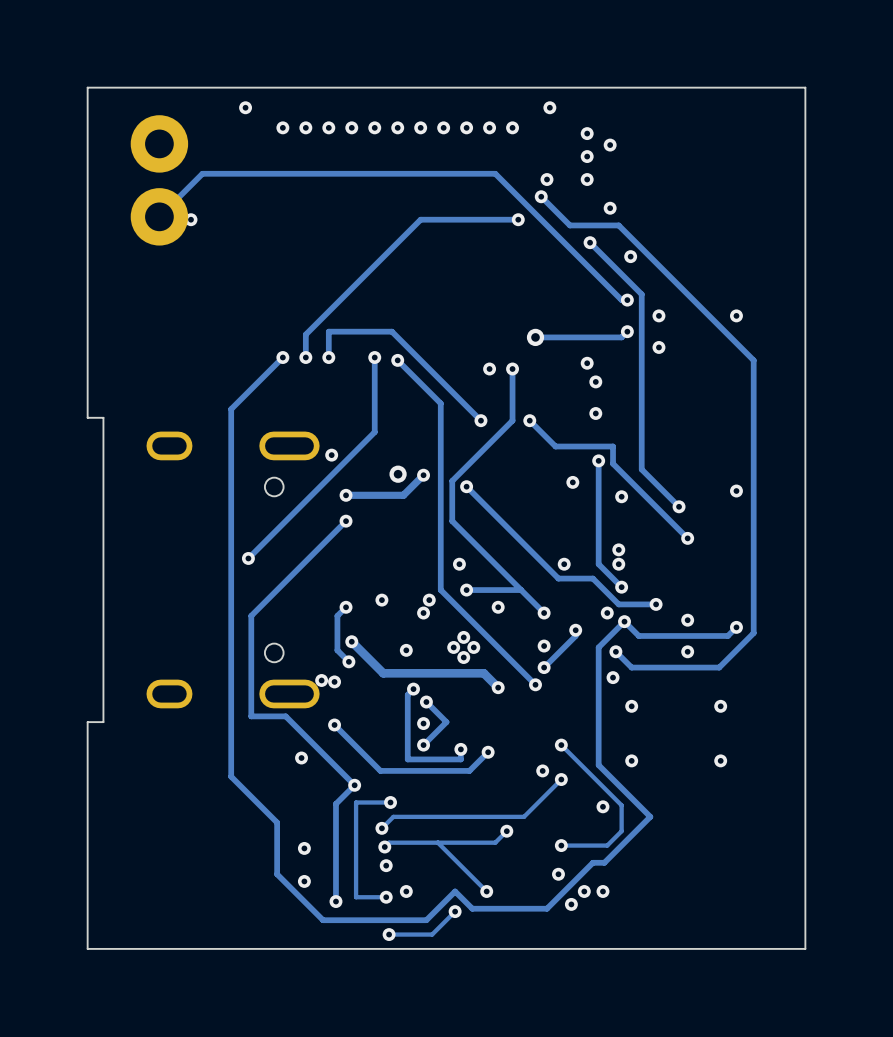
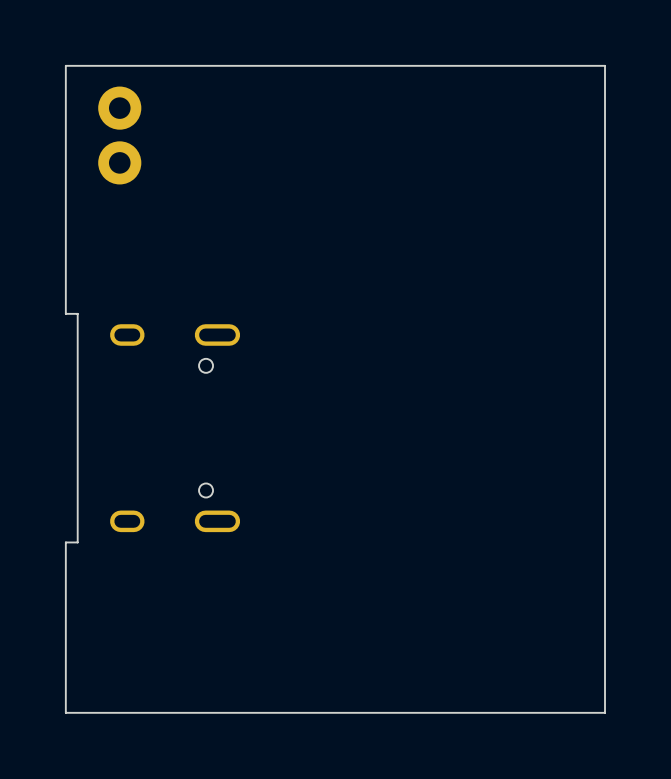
via: (245, 107) -> none
via: (549, 107) -> none
via: (282, 127) -> none
via: (305, 127) -> none
via: (328, 127) -> none
via: (351, 127) -> none
via: (374, 127) -> none
via: (397, 127) -> none
via: (420, 127) -> none
via: (443, 127) -> none
via: (466, 127) -> none
via: (489, 127) -> none
via: (512, 127) -> none
via: (587, 133) -> none
via: (610, 145) -> none
via: (587, 156) -> none
via: (546, 179) -> none
via: (587, 179) -> none
track: (541, 196) (569, 225) (618, 225) (753, 360) (753, 633) (719, 667) (631, 667) (615, 651) -> none
via: (541, 196) -> none
via: (610, 208) -> none
track: (159, 216) (202, 173) (495, 173) (621, 300) (627, 300) -> none
via: (191, 219) -> none
track: (518, 219) (420, 219) (305, 334) (305, 357) -> none
via: (518, 219) -> none
track: (590, 242) (641, 294) (641, 469) (679, 506) -> none
via: (590, 242) -> none
via: (630, 256) -> none
via: (627, 300) -> none
via: (658, 315) -> none
via: (736, 315) -> none
track: (627, 331) (621, 337) (535, 337) -> none
via: (627, 331) -> none
via: (535, 337) -> none
via: (658, 347) -> none
track: (282, 357) (231, 409) (231, 776) (277, 822) (277, 874) (323, 920) (426, 920) (455, 891) (472, 908) (546, 908) (592, 862) (604, 862) (650, 816) (598, 765) (598, 647) (624, 621) (638, 635) (727, 635) (736, 627) -> none
via: (282, 357) -> none
via: (305, 357) -> none
track: (328, 357) (328, 331) (391, 331) (480, 420) -> none
via: (328, 357) -> none
track: (374, 357) (374, 432) (248, 558) -> none
via: (374, 357) -> none
track: (397, 360) (440, 403) (440, 590) (535, 684) -> none
via: (397, 360) -> none
via: (587, 363) -> none
via: (489, 369) -> none
track: (512, 369) (512, 420) (452, 480) (452, 521) (544, 613) -> none
via: (512, 369) -> none
via: (595, 381) -> none
via: (595, 413) -> none
via: (480, 420) -> none
track: (529, 420) (555, 446) (613, 446) (613, 463) (687, 538) -> none
via: (529, 420) -> none
via: (331, 455) -> none
track: (598, 460) (598, 564) (621, 587) -> none
via: (598, 460) -> none
via: (398, 474) -> none
track: (423, 475) (403, 495) (346, 495) -> none
via: (423, 475) -> none
via: (572, 482) -> none
track: (466, 486) (558, 578) (592, 578) (618, 604) (656, 604) -> none
via: (466, 486) -> none
via: (736, 491) -> none
via: (346, 495) -> none
via: (621, 496) -> none
via: (679, 506) -> none
track: (346, 521) (251, 615) (251, 716) (285, 716) (354, 785) (335, 803) (335, 901) -> none
via: (346, 521) -> none
via: (687, 538) -> none
via: (618, 549) -> none
via: (248, 558) -> none
via: (459, 564) -> none
via: (564, 564) -> none
via: (618, 564) -> none
via: (621, 587) -> none
via: (466, 590) -> none
track: (521, 590) (466, 590) -> none
via: (381, 600) -> none
via: (429, 600) -> none
via: (656, 604) -> none
track: (346, 607) (337, 615) (337, 650) (348, 661) -> none
via: (346, 607) -> none
via: (498, 607) -> none
via: (423, 613) -> none
via: (544, 613) -> none
via: (607, 613) -> none
via: (687, 620) -> none
via: (624, 621) -> none
via: (736, 627) -> none
track: (575, 630) (575, 635) (544, 667) -> none
via: (575, 630) -> none
via: (463, 637) -> none
track: (351, 641) (383, 673) (483, 673) (498, 687) -> none
via: (351, 641) -> none
via: (544, 646) -> none
via: (453, 647) -> none
via: (473, 647) -> none
via: (406, 650) -> none
via: (615, 651) -> none
via: (687, 651) -> none
via: (463, 657) -> none
via: (348, 661) -> none
via: (544, 667) -> none
via: (613, 677) -> none
via: (321, 680) -> none
via: (334, 681) -> none
via: (535, 684) -> none
via: (498, 687) -> none
track: (413, 689) (407, 694) (407, 759) (460, 759) (460, 749) -> none
via: (413, 689) -> none
track: (426, 702) (446, 722) (423, 745) -> none
via: (426, 702) -> none
via: (631, 706) -> none
via: (720, 706) -> none
via: (423, 723) -> none
track: (334, 724) (380, 770) (469, 770) (488, 752) -> none
via: (334, 724) -> none
via: (423, 745) -> none
track: (561, 745) (621, 805) (621, 831) (607, 845) (561, 845) -> none
via: (561, 745) -> none
via: (460, 749) -> none
via: (488, 752) -> none
via: (301, 758) -> none
via: (631, 760) -> none
via: (720, 760) -> none
via: (542, 770) -> none
track: (561, 779) (524, 816) (393, 816) (381, 828) -> none
via: (561, 779) -> none
via: (354, 785) -> none
track: (390, 802) (356, 802) (356, 897) (386, 897) -> none
via: (390, 802) -> none
via: (602, 806) -> none
via: (381, 828) -> none
track: (506, 831) (495, 842) (389, 842) (384, 847) -> none
via: (506, 831) -> none
track: (437, 842) (486, 891) -> none
via: (561, 845) -> none
via: (384, 847) -> none
via: (304, 848) -> none
via: (386, 865) -> none
via: (558, 874) -> none
via: (304, 881) -> none
via: (406, 891) -> none
via: (486, 891) -> none
via: (584, 891) -> none
via: (602, 891) -> none
via: (386, 897) -> none
via: (335, 901) -> none
via: (571, 904) -> none
track: (455, 911) (432, 934) (389, 934) -> none
via: (455, 911) -> none
via: (389, 934) -> none

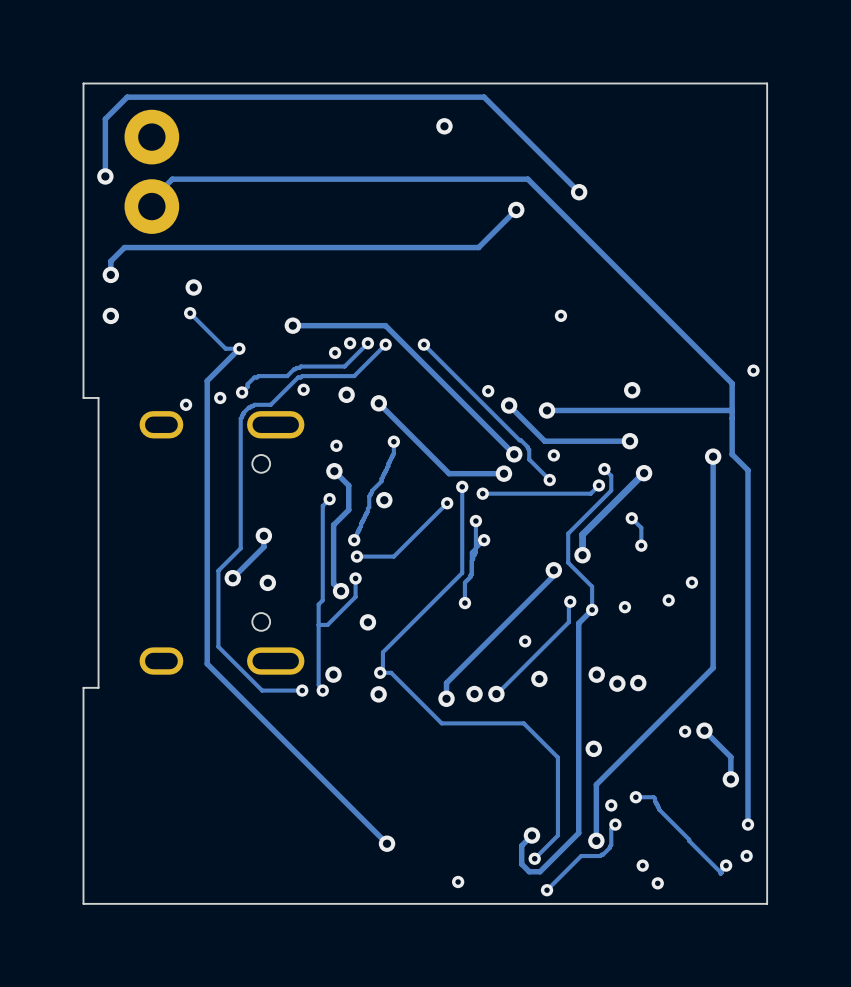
via: none -> (444, 126)
track: none -> (105, 176) (105, 119) (127, 97) (484, 97) (579, 192)
via: none -> (105, 176)
via: none -> (579, 192)
track: none -> (145, 206) (172, 179) (527, 179) (732, 383) (732, 454) (748, 470) (748, 824)
track: none -> (516, 209) (478, 247) (124, 247) (110, 261) (110, 274)
via: none -> (516, 209)
via: none -> (110, 274)
via: none -> (193, 287)
track: none -> (190, 313) (225, 348) (239, 348) (207, 380) (207, 663) (387, 843)
via: none -> (190, 313)
via: none -> (110, 315)
via: none -> (560, 315)
track: none -> (292, 325) (385, 325) (514, 454)
via: none -> (292, 325)
via: none -> (350, 343)
track: none -> (367, 343) (344, 366) (300, 366) (294, 369) (287, 376) (258, 376) (254, 377) (242, 392)
via: none -> (367, 343)
track: none -> (385, 344) (354, 376) (298, 377) (270, 404) (254, 404) (248, 407) (240, 418) (240, 548) (218, 570) (218, 646) (262, 690) (302, 690)
via: none -> (385, 344)
track: none -> (423, 344) (527, 447) (529, 459) (549, 480)
via: none -> (423, 344)
via: none -> (239, 348)
via: none -> (335, 352)
via: none -> (753, 370)
via: none -> (303, 389)
via: none -> (632, 390)
via: none -> (488, 391)
via: none -> (242, 392)
via: none -> (346, 394)
via: none -> (220, 397)
track: none -> (378, 403) (449, 473) (503, 473)
via: none -> (378, 403)
via: none -> (186, 404)
track: none -> (509, 405) (544, 441) (629, 441)
via: none -> (509, 405)
track: none -> (547, 410) (732, 411)
via: none -> (547, 410)
via: none -> (629, 441)
track: none -> (393, 441) (393, 454) (381, 481) (369, 496) (367, 511) (354, 540)
via: none -> (393, 441)
via: none -> (336, 445)
via: none -> (514, 454)
via: none -> (553, 455)
track: none -> (713, 456) (713, 667) (596, 784) (596, 840)
via: none -> (713, 456)
track: none -> (604, 469) (611, 475) (611, 490) (568, 533) (568, 562) (592, 586) (592, 609) (578, 623) (578, 833) (540, 871) (529, 871) (521, 864) (521, 845) (531, 835)
via: none -> (604, 469)
track: none -> (334, 471) (348, 485) (348, 509) (333, 525) (333, 583) (341, 591)
via: none -> (334, 471)
via: none -> (503, 473)
track: none -> (644, 473) (582, 534) (582, 555)
via: none -> (644, 473)
via: none -> (549, 480)
track: none -> (598, 485) (590, 493) (482, 493)
via: none -> (598, 485)
track: none -> (462, 486) (462, 572) (382, 652) (382, 671)
via: none -> (462, 486)
via: none -> (482, 493)
track: none -> (329, 499) (322, 505) (322, 600) (318, 604) (318, 685) (322, 690)
via: none -> (329, 499)
via: none -> (384, 500)
track: none -> (447, 503) (393, 556) (356, 556)
via: none -> (447, 503)
track: none -> (631, 518) (641, 527) (641, 545)
via: none -> (631, 518)
track: none -> (475, 521) (475, 552) (471, 560)
via: none -> (475, 521)
track: none -> (263, 535) (263, 547) (232, 578)
via: none -> (263, 535)
via: none -> (354, 540)
track: none -> (484, 540) (471, 552) (471, 574) (464, 582) (464, 603)
via: none -> (484, 540)
via: none -> (641, 545)
via: none -> (582, 555)
via: none -> (356, 556)
track: none -> (553, 570) (553, 575) (446, 683) (446, 698)
via: none -> (553, 570)
via: none -> (232, 578)
track: none -> (355, 578) (355, 596) (327, 624) (318, 624)
via: none -> (355, 578)
via: none -> (267, 582)
via: none -> (691, 582)
via: none -> (341, 591)
via: none -> (668, 600)
track: none -> (570, 601) (568, 622) (496, 694)
via: none -> (570, 601)
via: none -> (464, 603)
via: none -> (624, 607)
via: none -> (592, 609)
via: none -> (367, 622)
via: none -> (525, 641)
track: none -> (380, 672) (391, 672) (441, 723) (523, 723) (557, 757) (557, 835) (534, 858)
via: none -> (380, 672)
via: none -> (333, 674)
via: none -> (596, 674)
via: none -> (539, 678)
via: none -> (638, 683)
via: none -> (617, 683)
via: none -> (302, 690)
via: none -> (322, 690)
via: none -> (378, 694)
via: none -> (474, 694)
via: none -> (496, 694)
via: none -> (446, 698)
via: none -> (685, 731)
track: none -> (704, 730) (730, 757) (730, 779)
via: none -> (704, 730)
via: none -> (593, 748)
via: none -> (730, 779)
track: none -> (635, 797) (653, 797) (659, 809) (720, 873) (726, 865)
via: none -> (635, 797)
via: none -> (611, 805)
track: none -> (615, 824) (611, 828) (611, 845) (603, 854) (581, 856) (547, 890)
via: none -> (615, 824)
via: none -> (748, 824)
via: none -> (531, 835)
via: none -> (596, 840)
via: none -> (387, 843)
via: none -> (746, 856)
via: none -> (534, 858)
via: none -> (642, 865)
via: none -> (726, 865)
via: none -> (458, 881)
via: none -> (657, 883)
via: none -> (547, 890)

